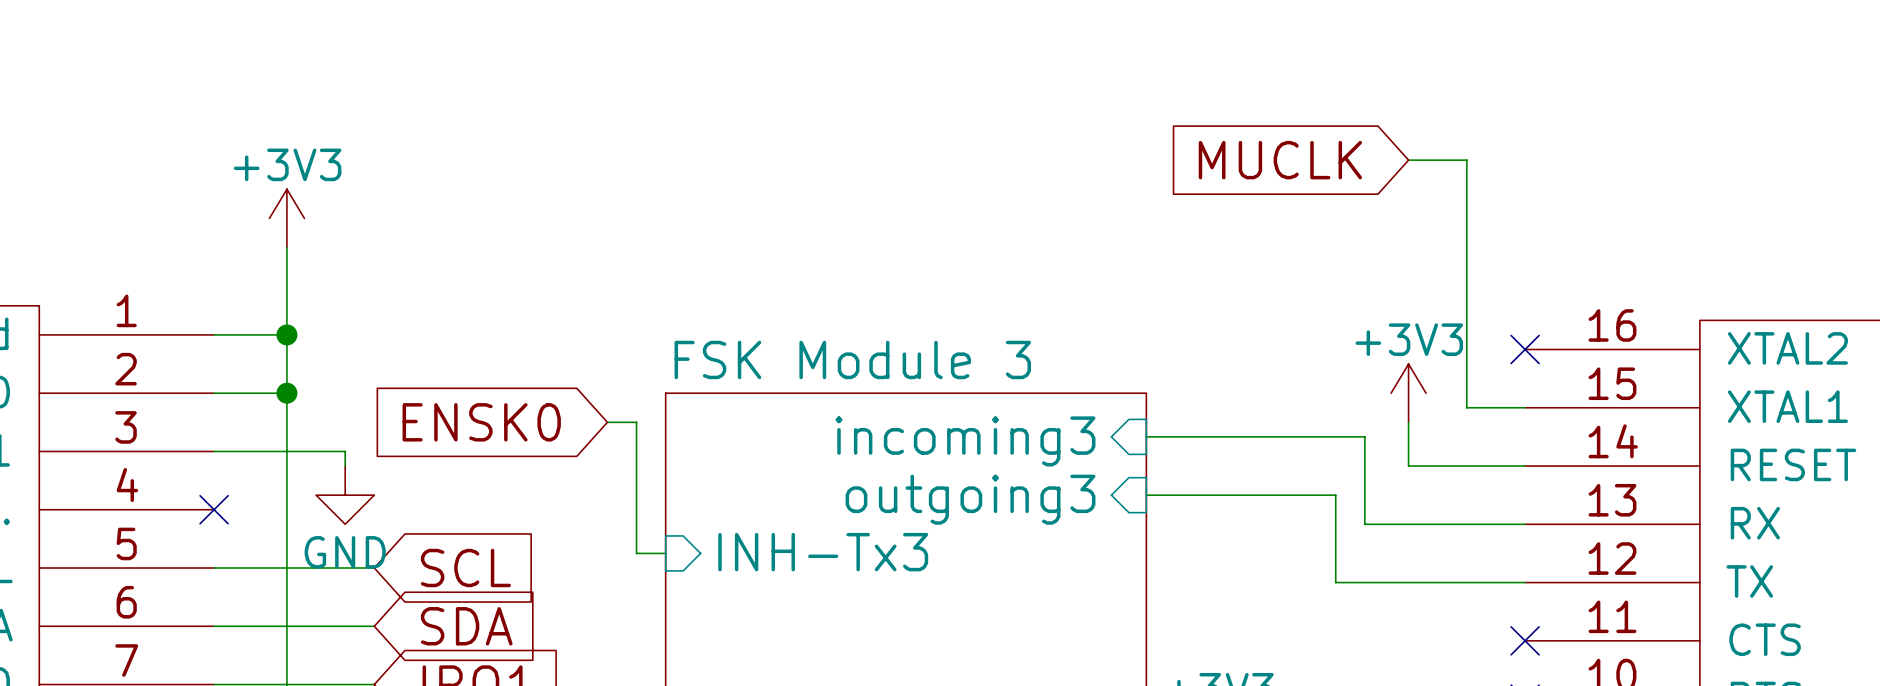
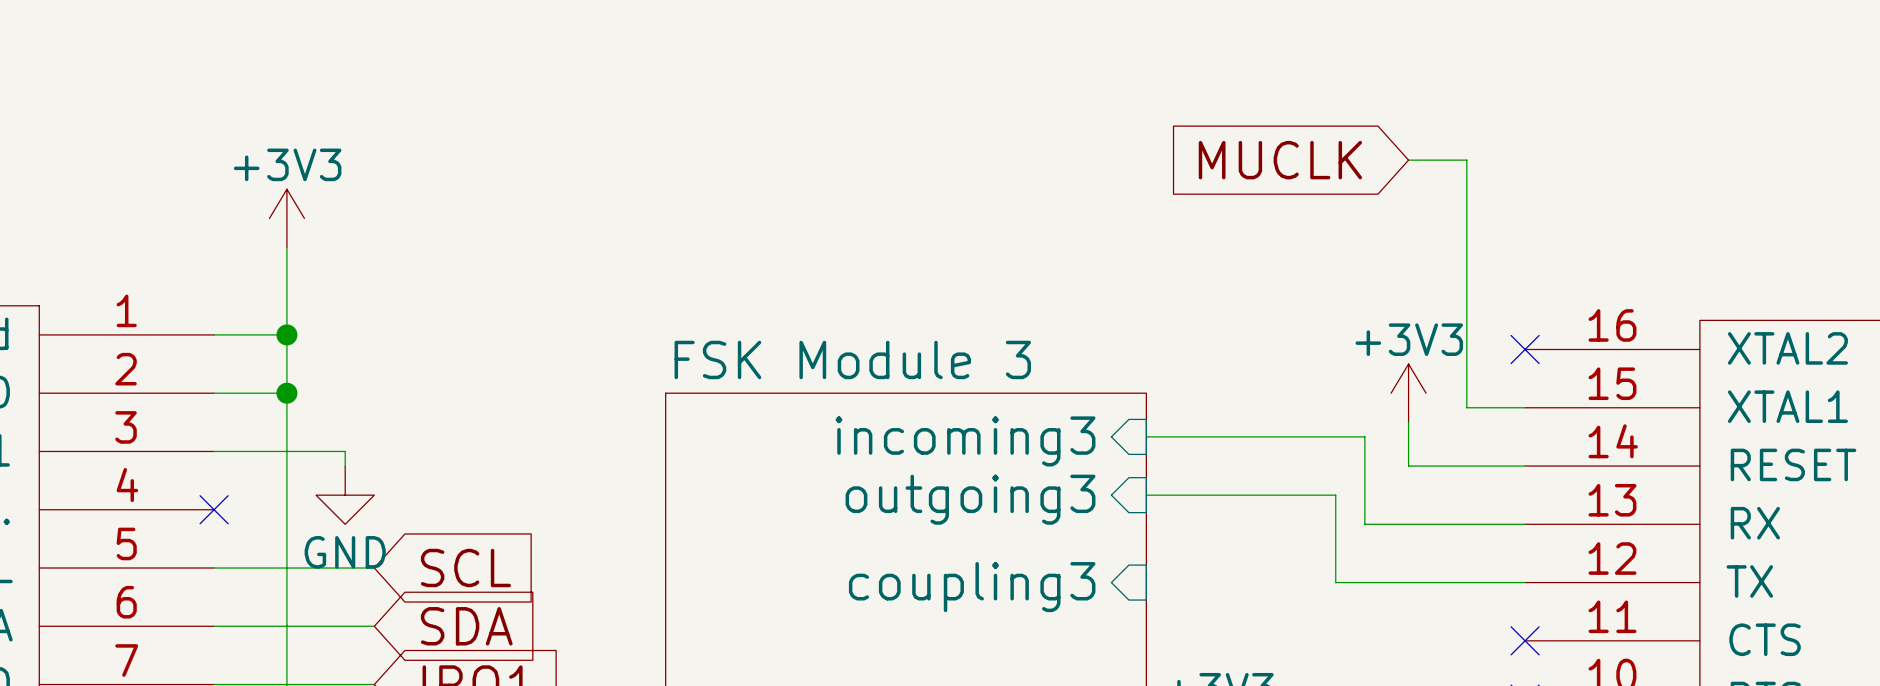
global label: ENSK0 (481, 422) -> none
wire: (607, 422) (636, 422) (636, 553) (665, 553) -> none
sheet pin: INH-Tx3 (823, 552) -> none
sheet pin: none -> coupling3 (972, 587)

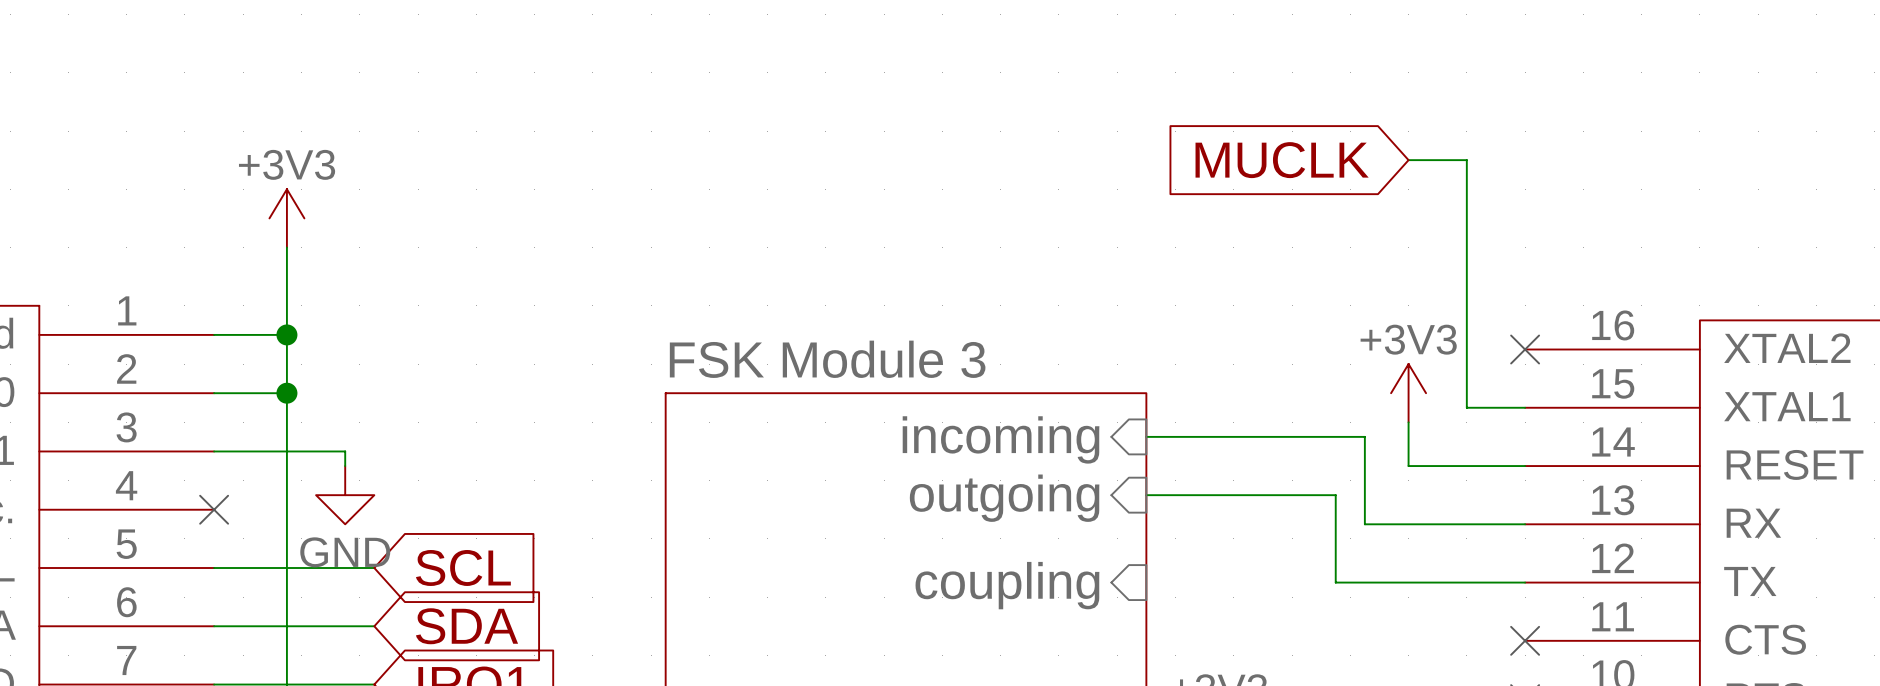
sheet pin: incoming3 (965, 441) -> incoming (1001, 439)
sheet pin: outgoing3 (970, 499) -> outgoing (1004, 498)
sheet pin: coupling3 (972, 587) -> coupling (1007, 585)

